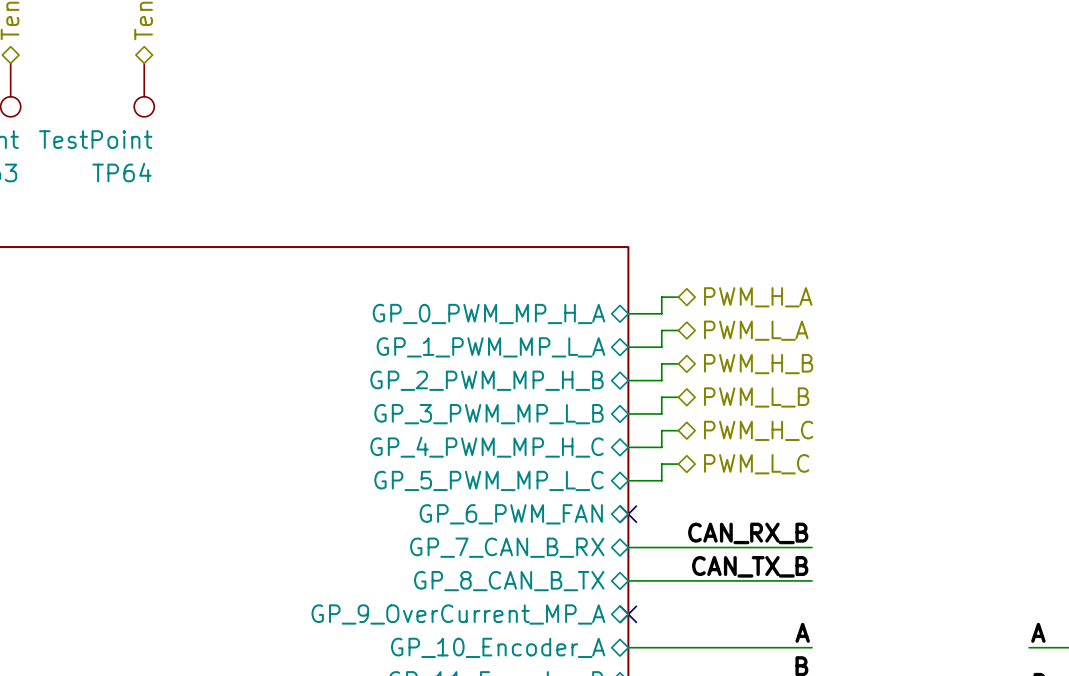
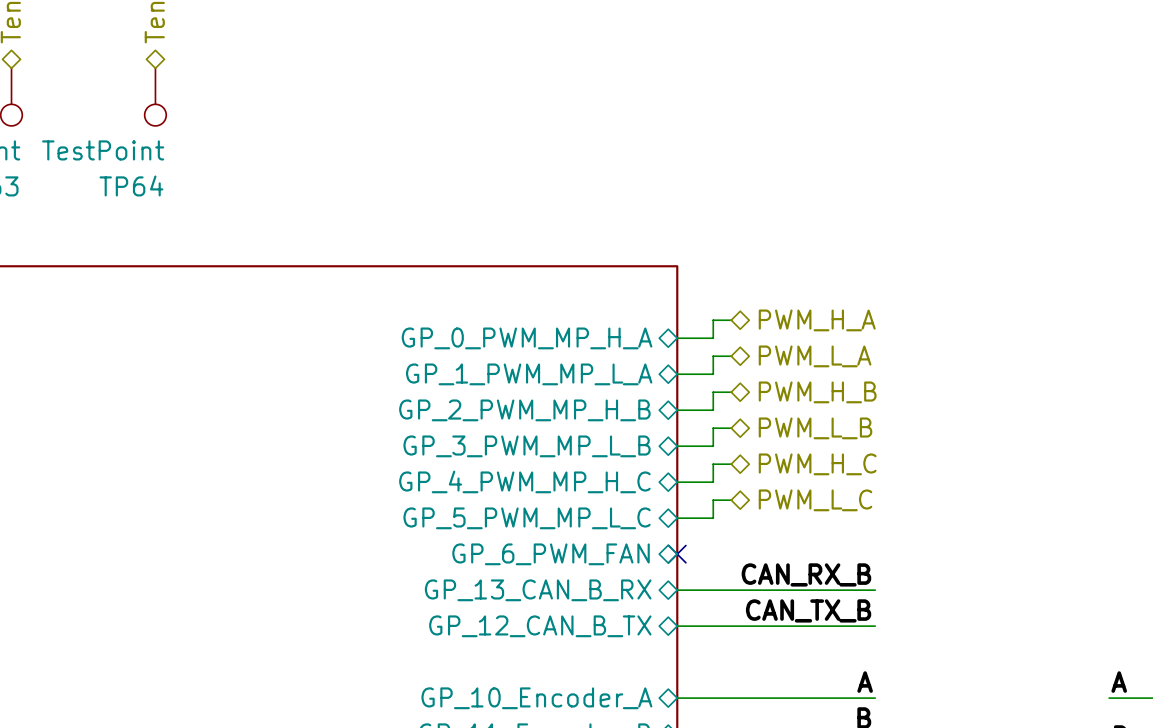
sheet pin: GP_7_CAN_B_RX (507, 547) -> GP_13_CAN_B_RX (538, 590)
sheet pin: GP_8_CAN_B_TX (509, 581) -> GP_12_CAN_B_TX (540, 626)
sheet pin: GP_9_OverCurrent_MP_A (458, 614) -> none
no-connect mark: (628, 614) -> none

